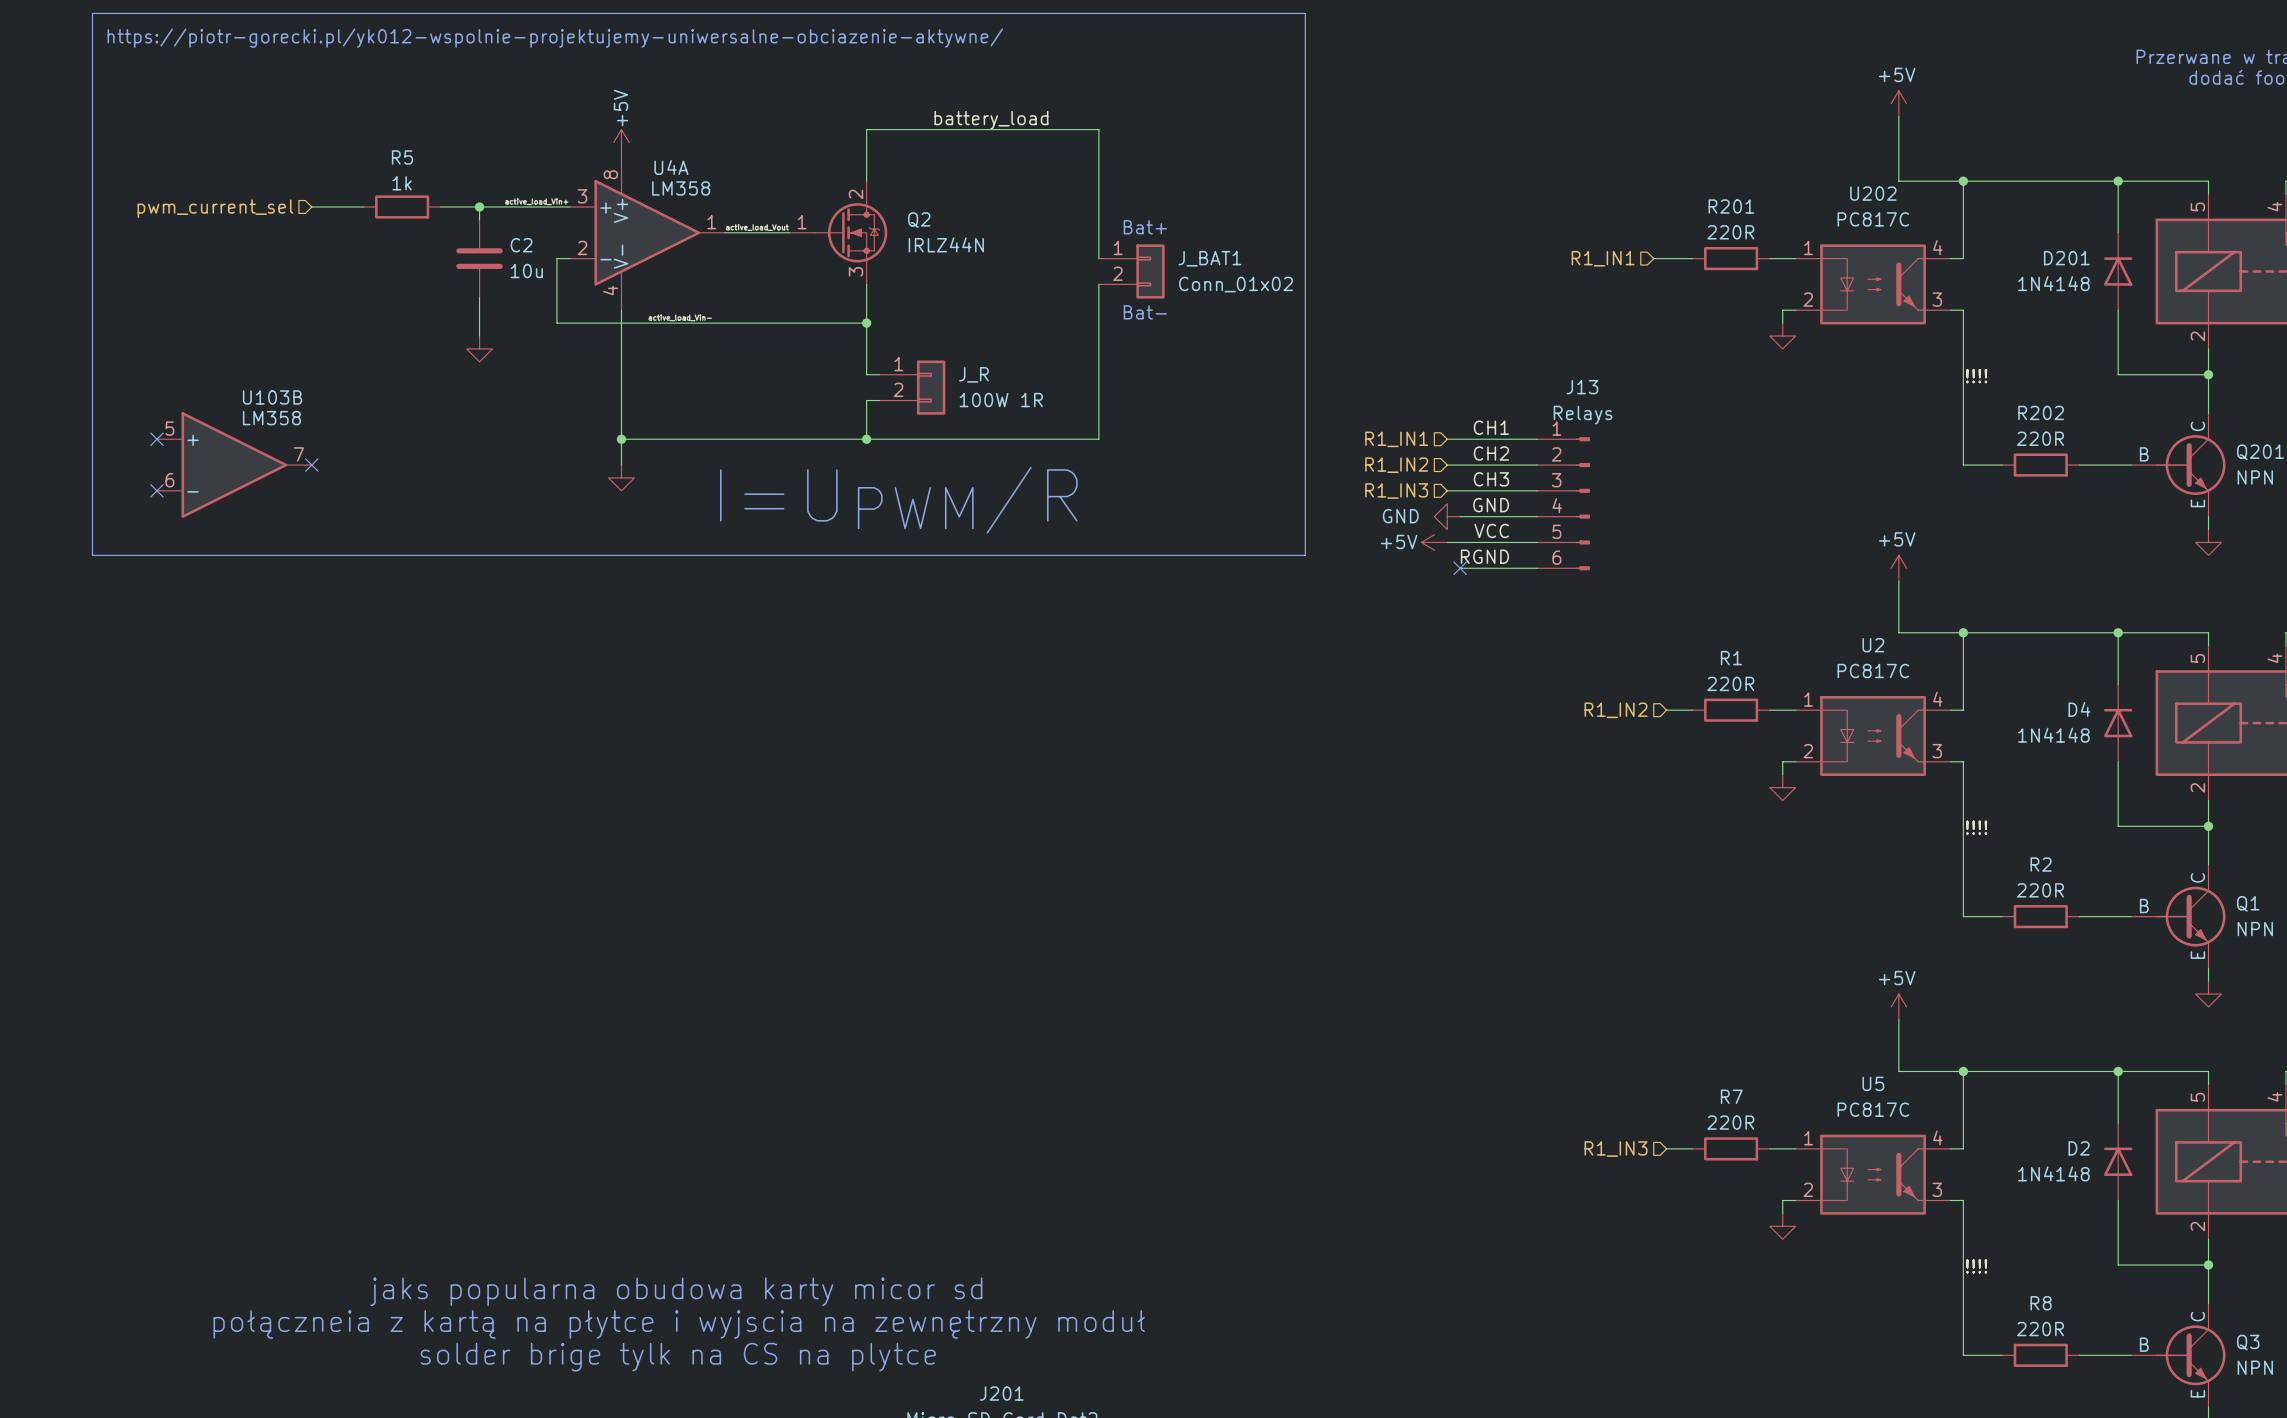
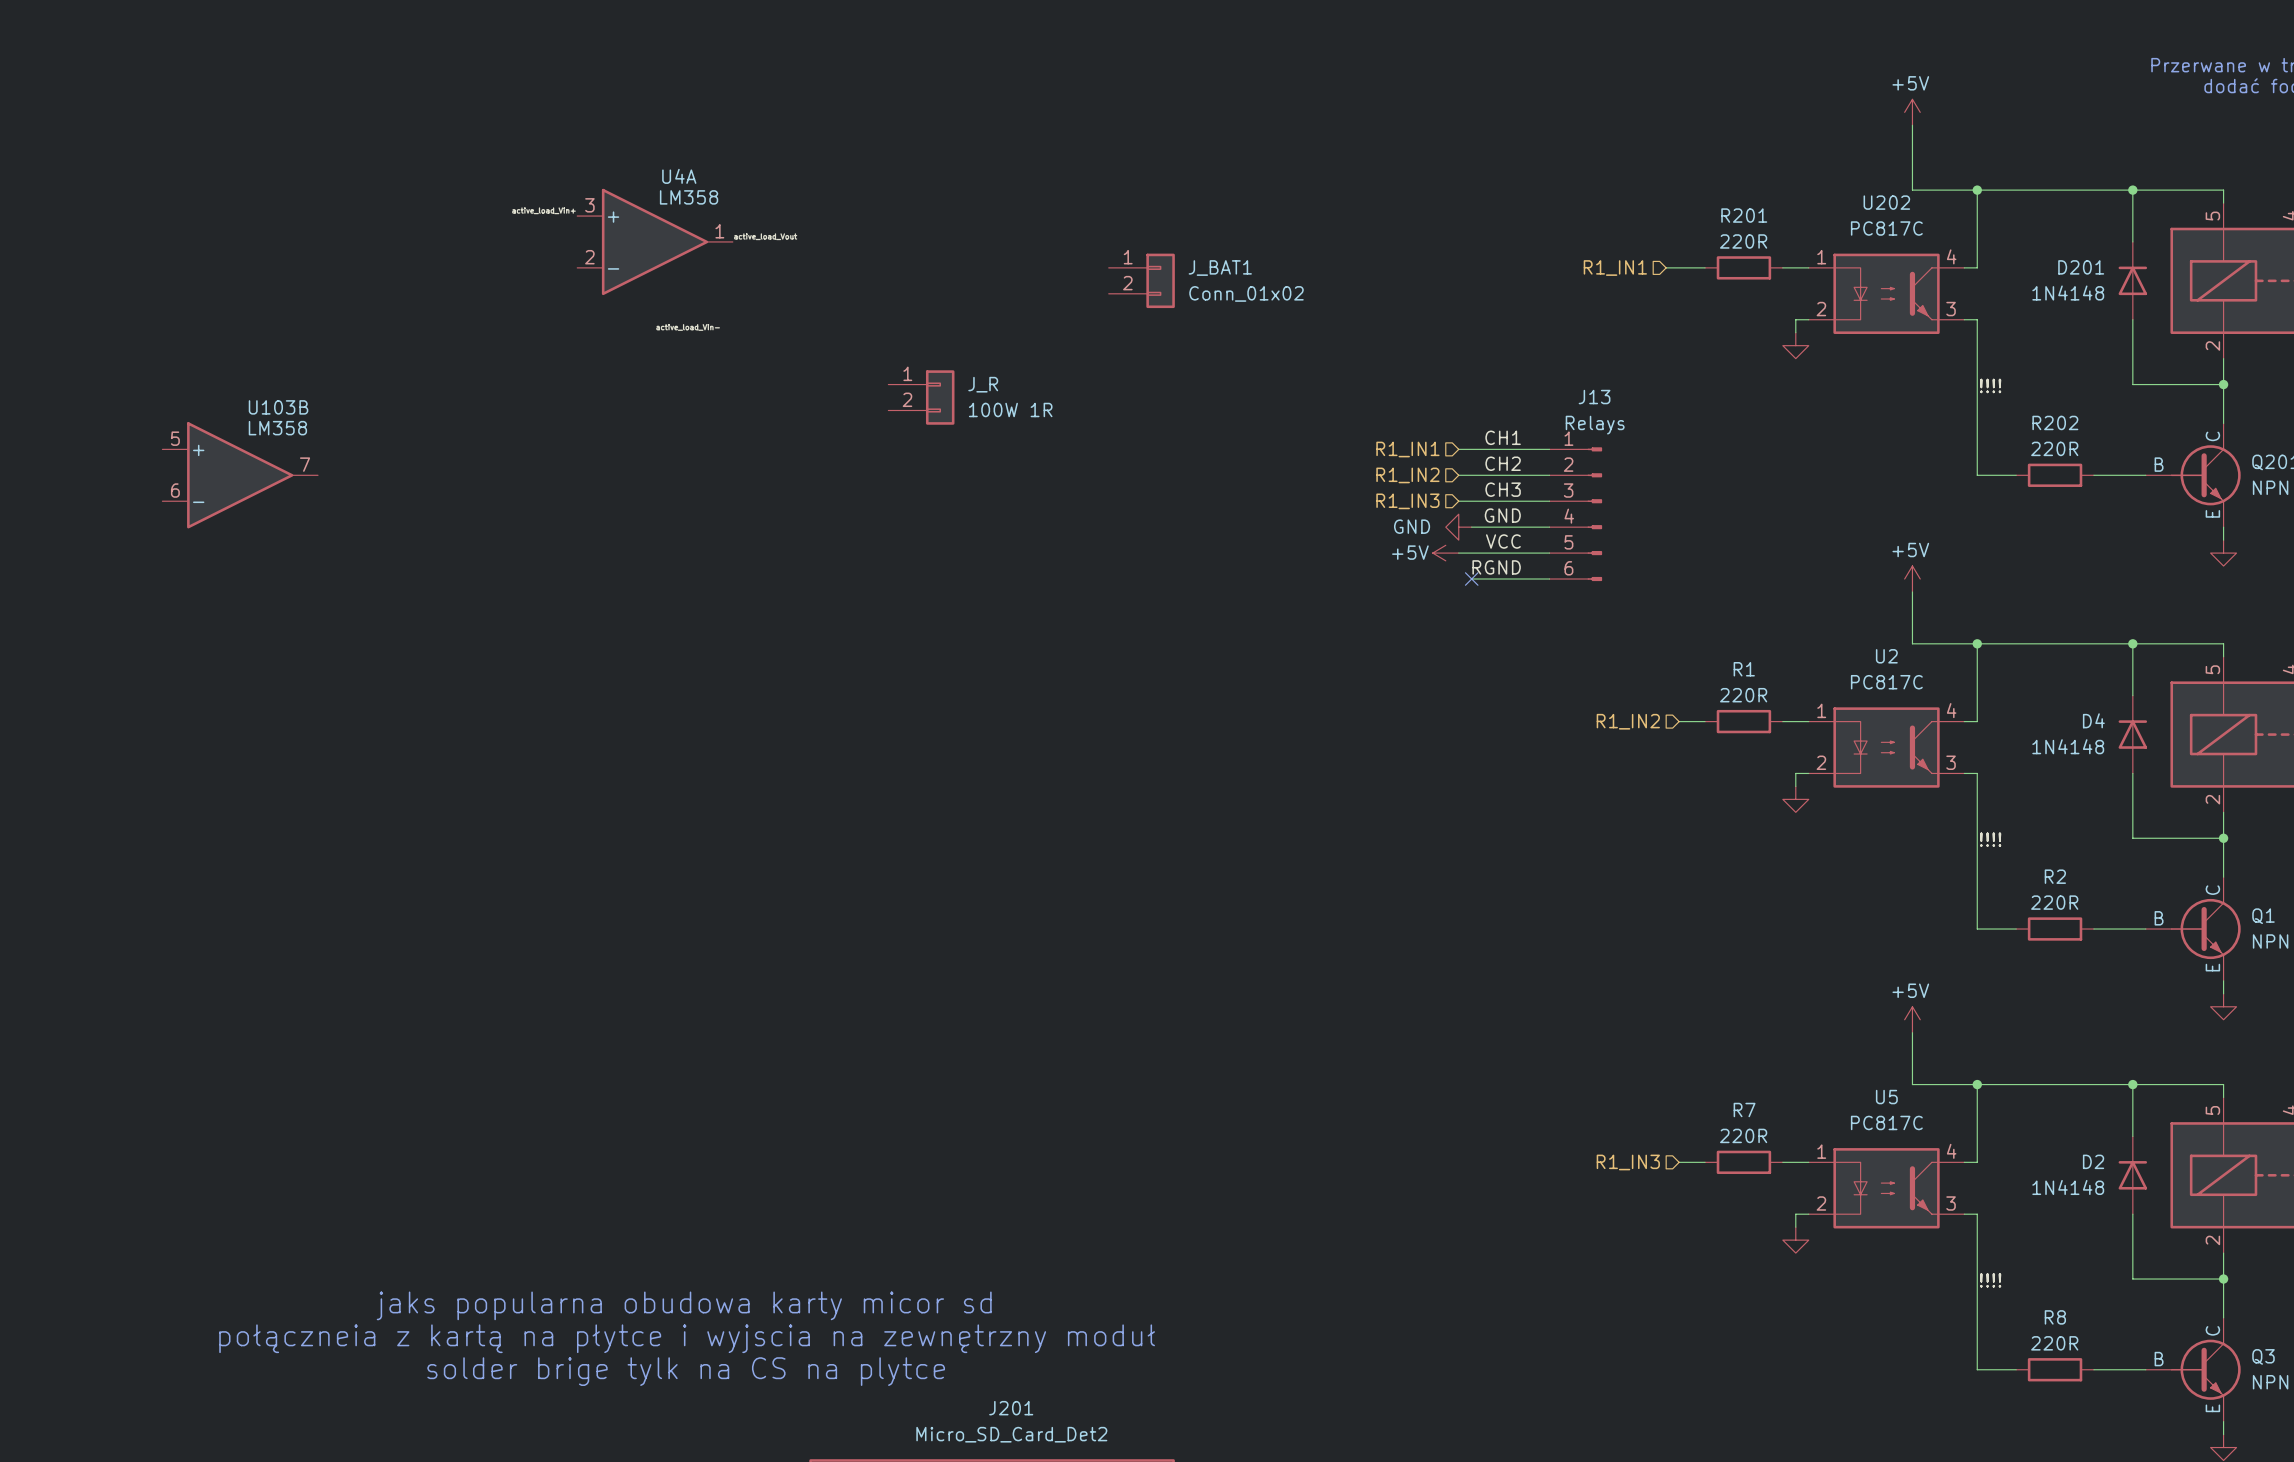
line: (92, 13) (1305, 13) (1305, 555) (92, 555) (92, 13) -> none
text: https://piotr-gorecki.pl/yk012-wspolnie-projektujemy-uniwersalne-obciazenie-aktywne/ (555, 38) -> none
label: battery_load (991, 120) -> none
power symbol: +5V (621, 142) -> none
wire: (866, 181) (866, 129) (1098, 129) (1098, 258) -> none
wire: (311, 206) (363, 206) -> none
R5: 1k (402, 206) -> none
wire: (440, 206) (569, 206) -> none
wire: (479, 206) (479, 219) -> none
junction: (479, 206) -> none
hierarchical label: pwm_current_sel (215, 208) -> none
text: Bat+ (1145, 227) -> none
part: (621, 232) -> none
wire: (724, 232) (789, 232) -> none
Q2: IRLZ44N (838, 232) -> none
C2: 10u (479, 258) -> none
wire: (569, 258) (556, 258) (556, 323) (866, 323) -> none
wire: (866, 284) (866, 374) (879, 374) -> none
wire: (1098, 284) (1098, 439) (621, 439) -> none
wire: (479, 297) (479, 336) -> none
wire: (621, 310) (621, 465) -> none
text: Bat- (1145, 312) -> none
junction: (866, 323) -> none
power symbol: (479, 348) -> none
wire: (879, 400) (866, 400) (866, 439) -> none
no-connect mark: (156, 439) -> none
junction: (621, 439) -> none
junction: (866, 439) -> none
no-connect mark: (311, 465) -> none
power symbol: (621, 477) -> none
no-connect mark: (156, 490) -> none
text: I=UPWM/R (898, 500) -> none

